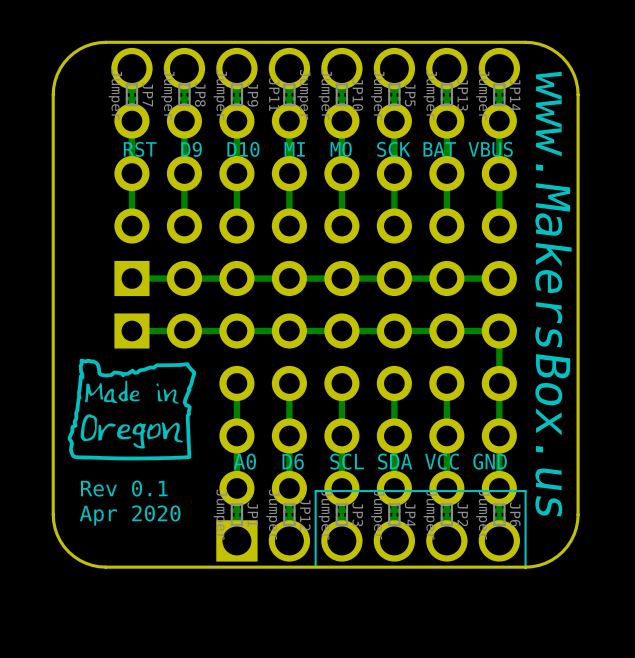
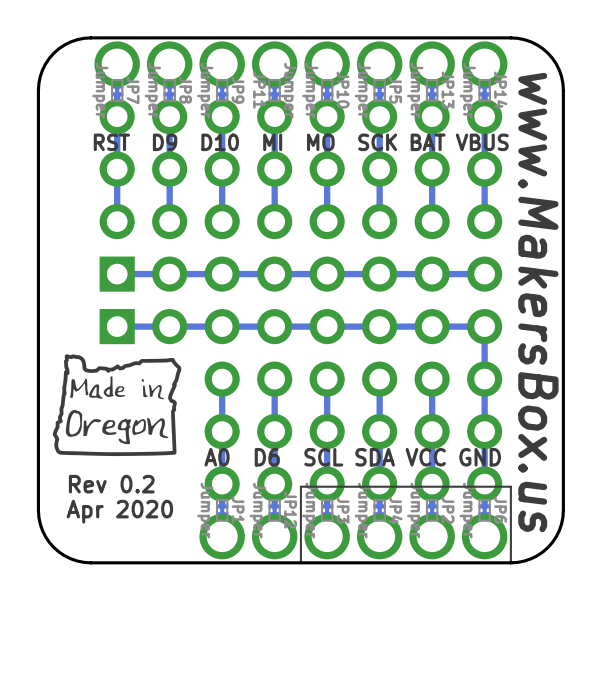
part footprint: [111, 47, 521, 90] -> [94, 41, 508, 87]
text: Rev 0.1 (124, 488) -> Rev 0.2 (111, 484)
part footprint: [216, 490, 527, 569] -> [199, 485, 512, 564]

